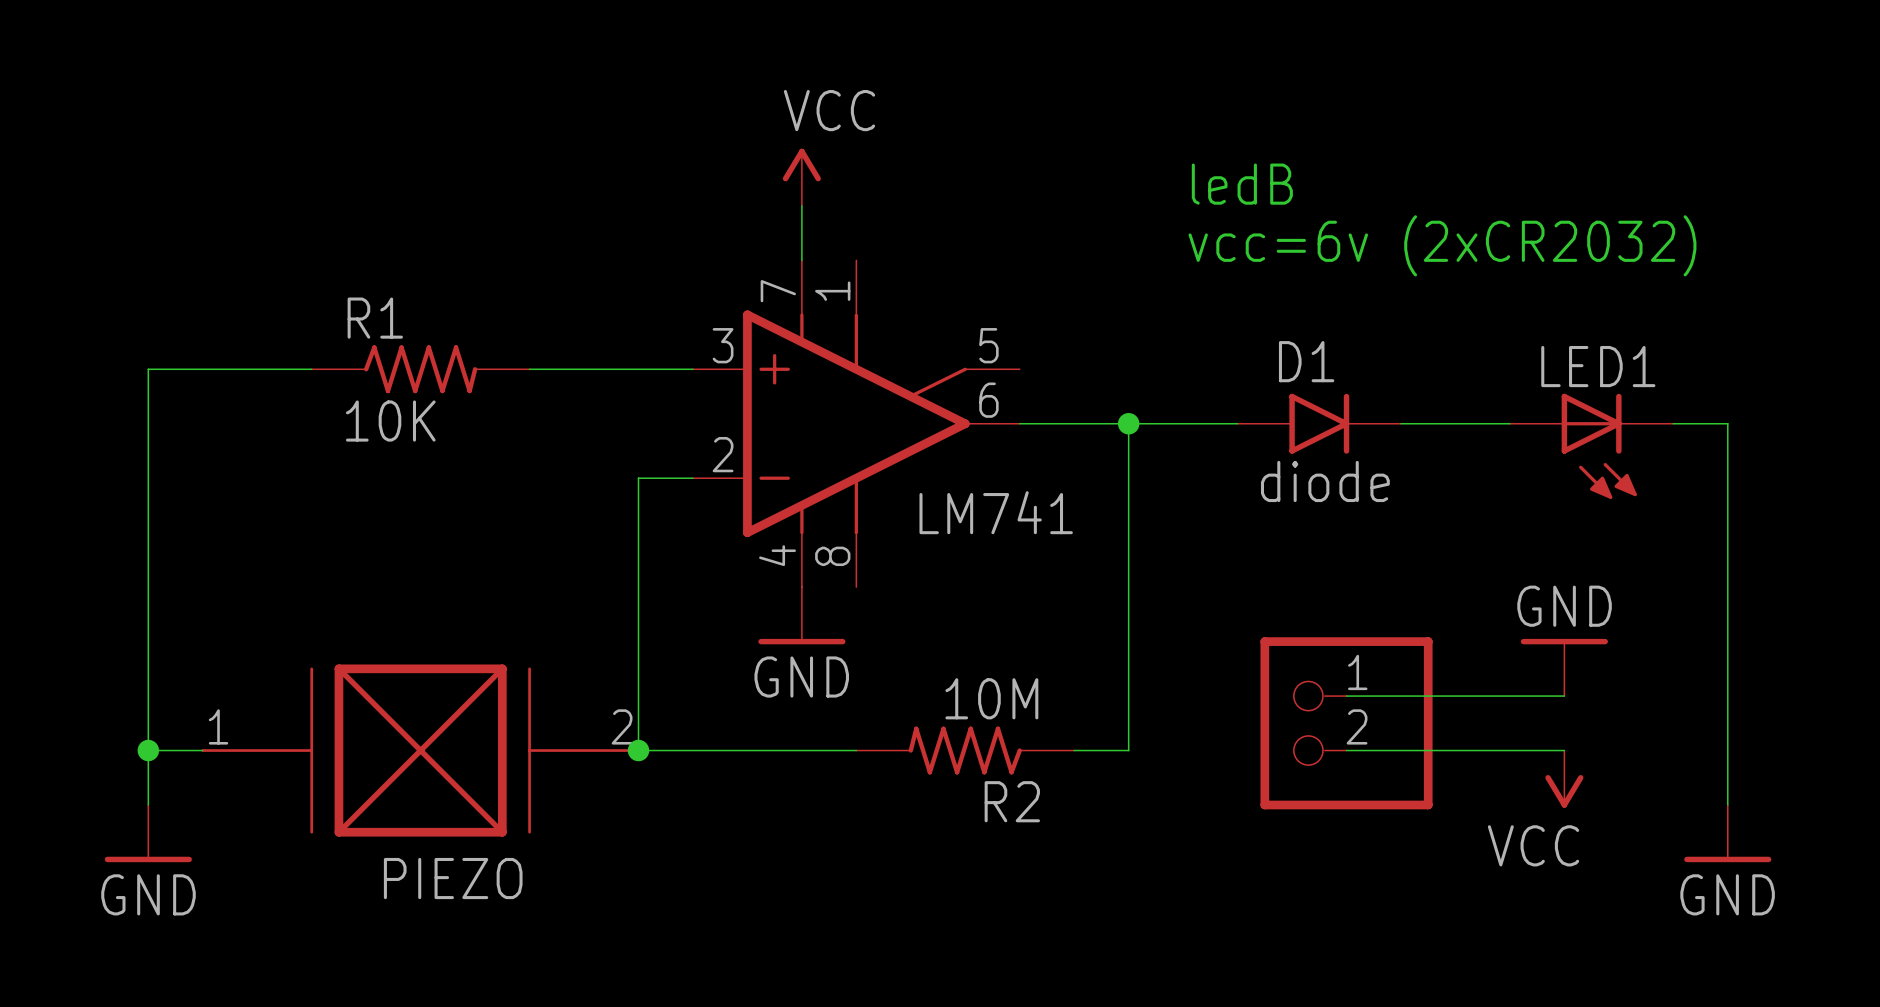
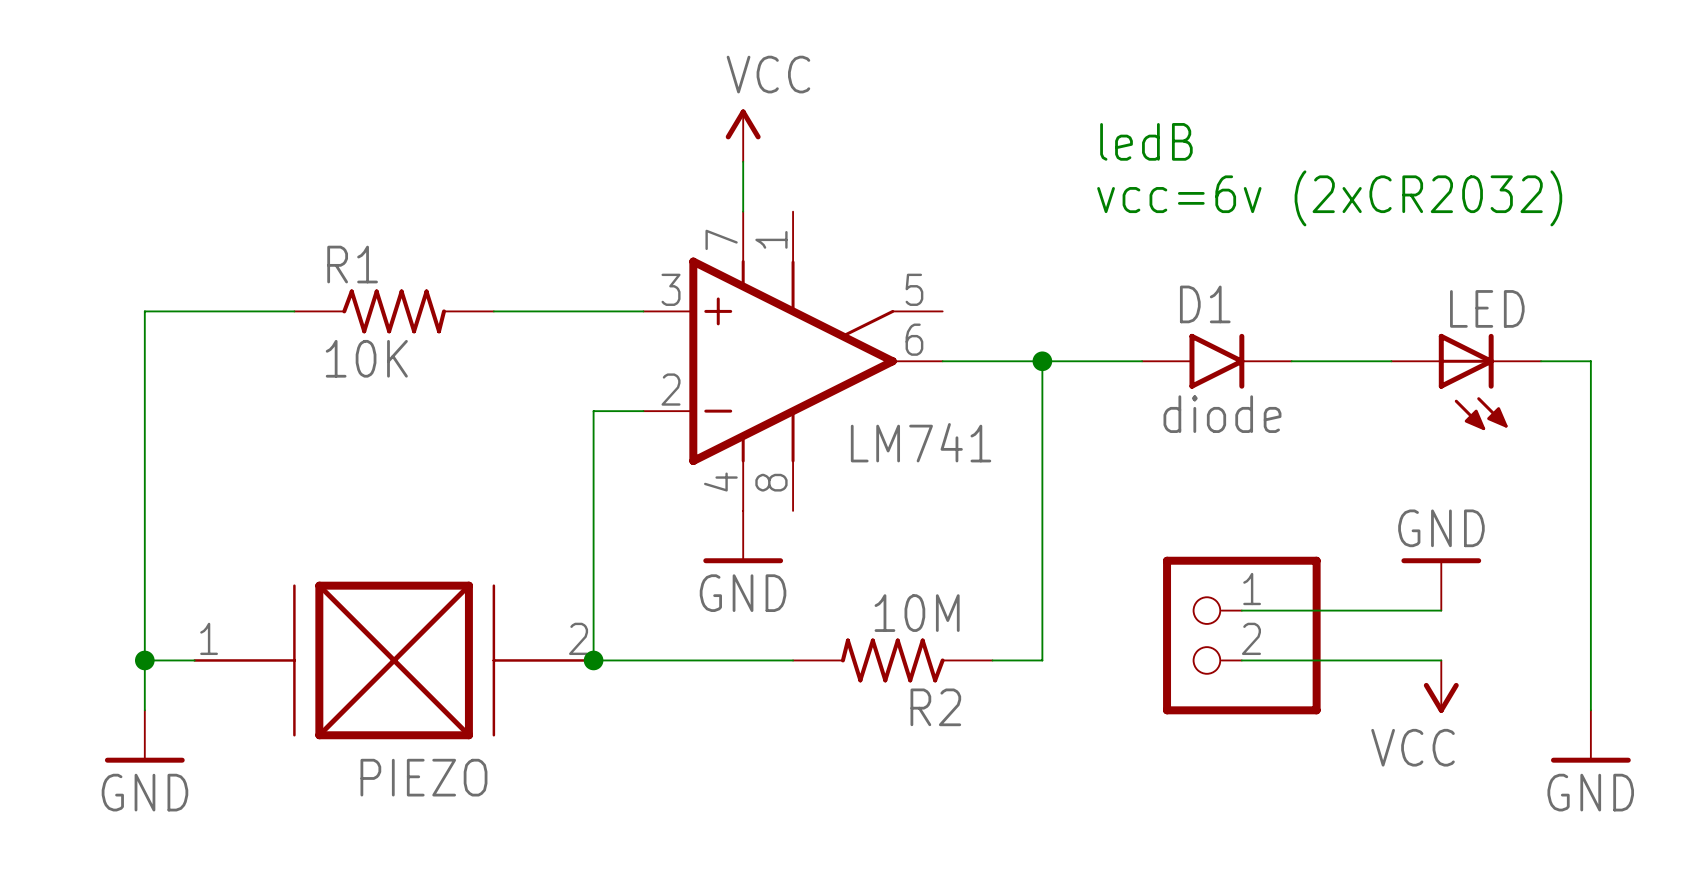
LED1 name: LED1 (1598, 366) -> LED (1487, 308)

